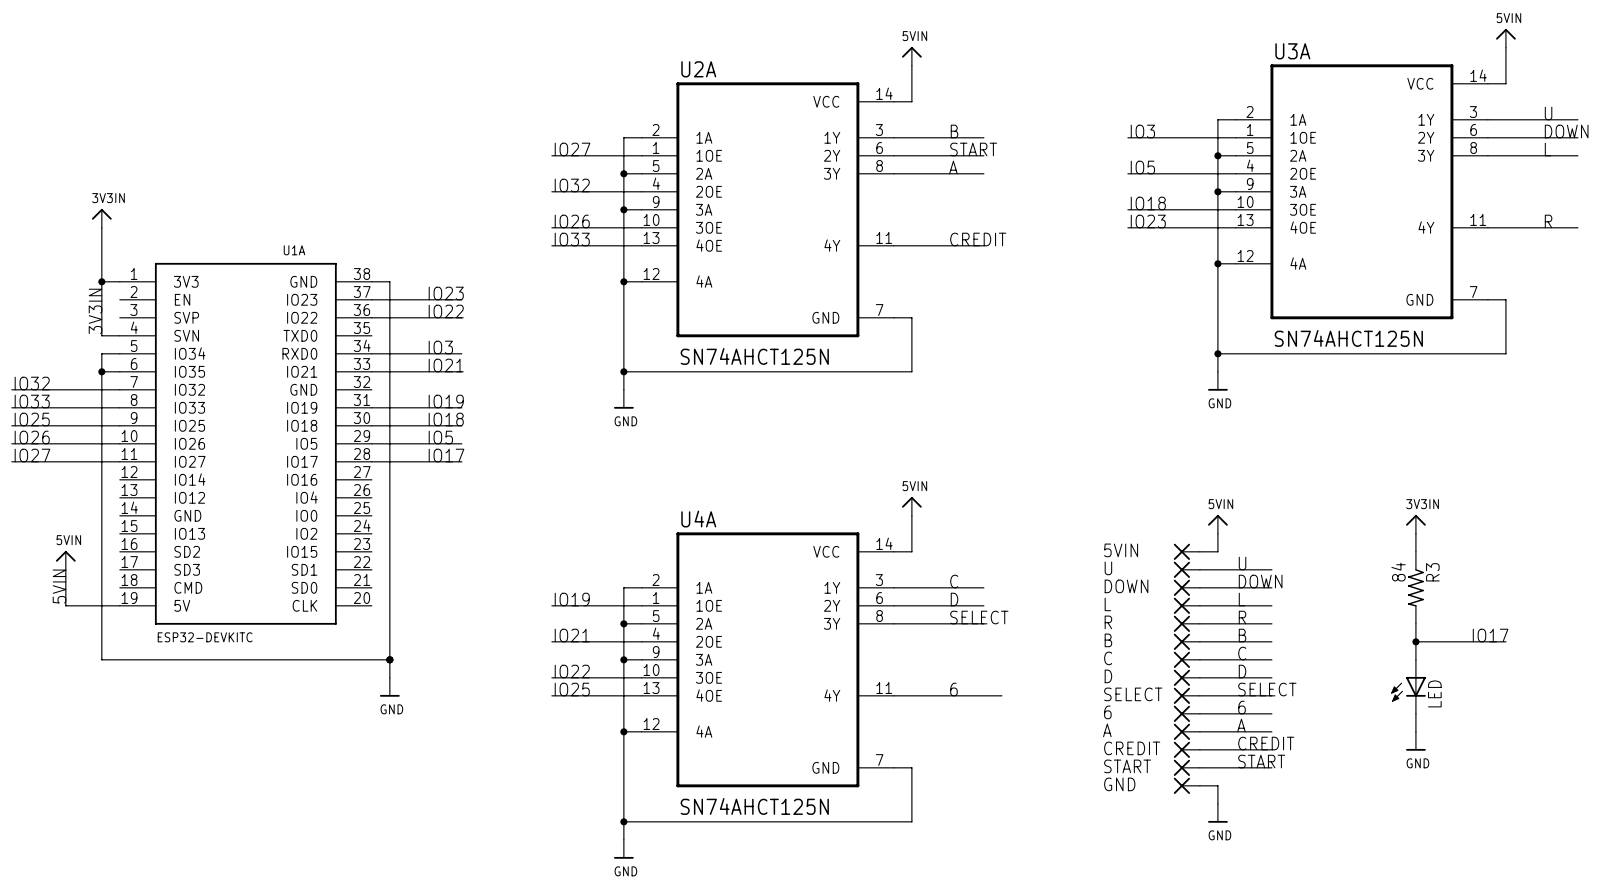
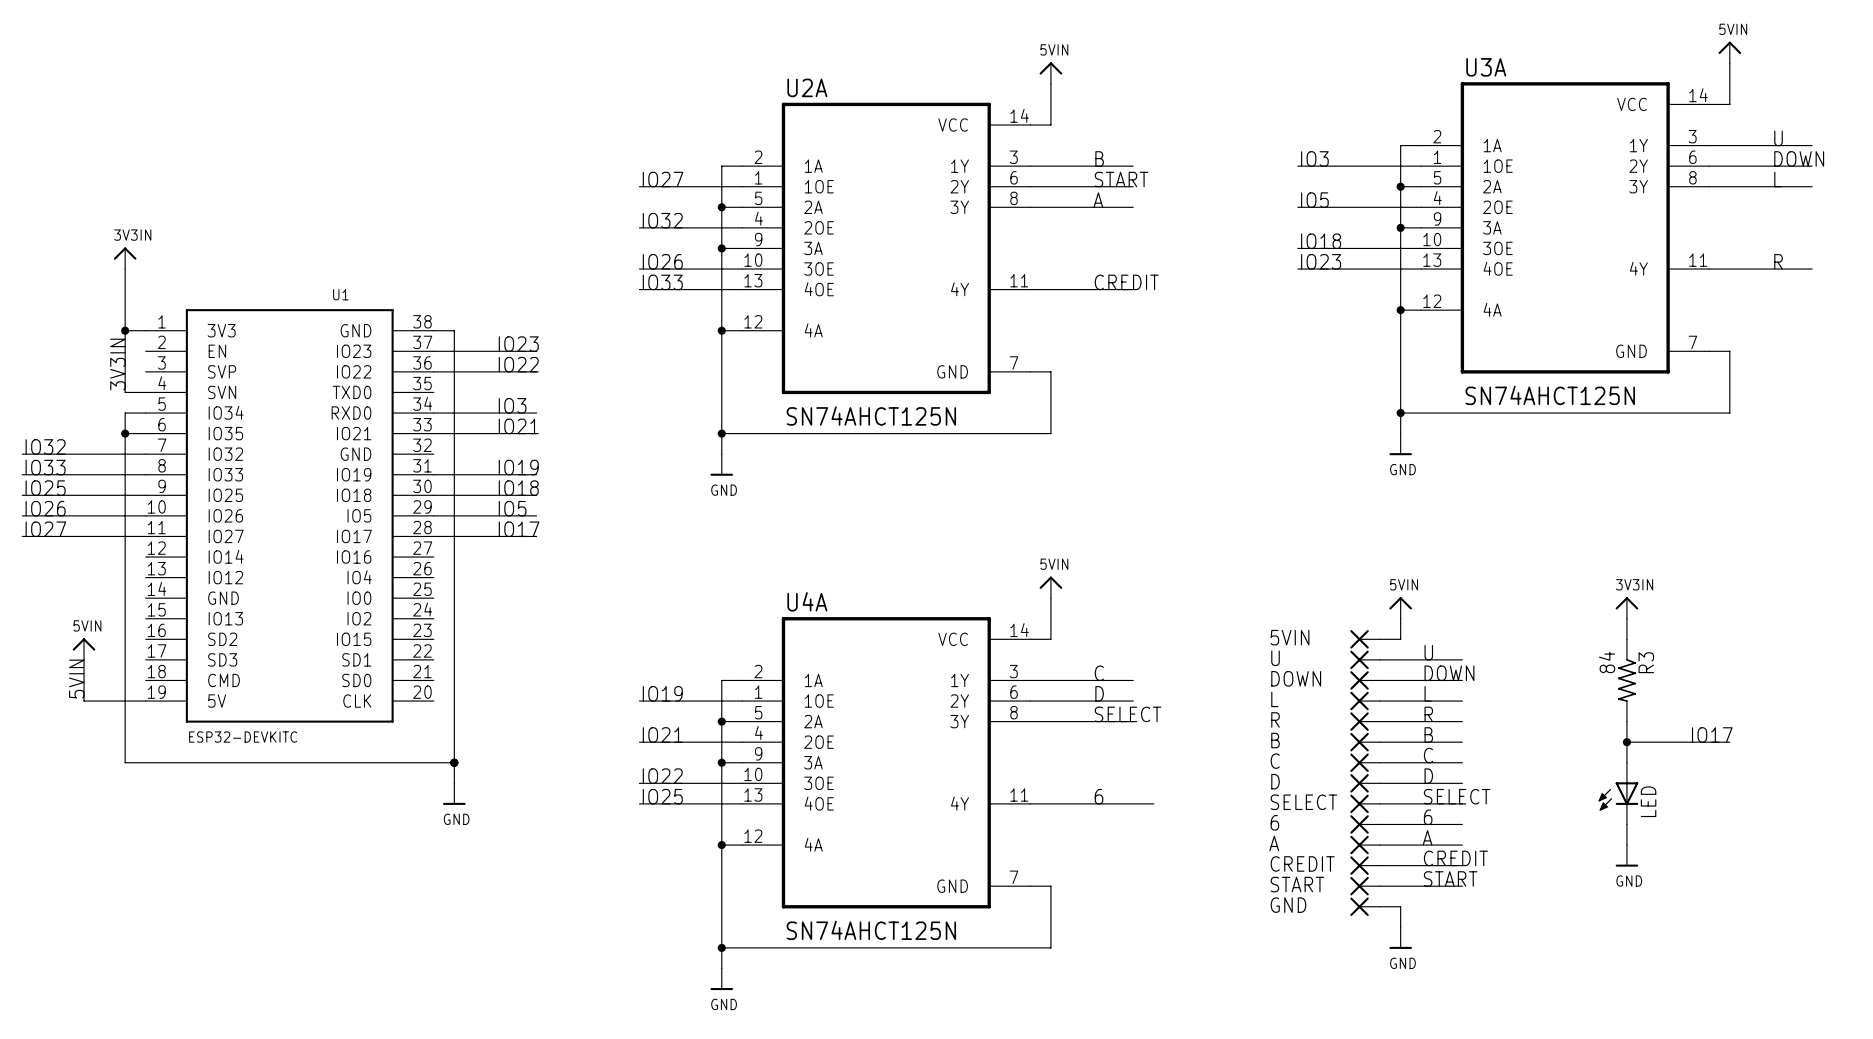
U1A name: U1A (294, 250) -> U1 (340, 294)

